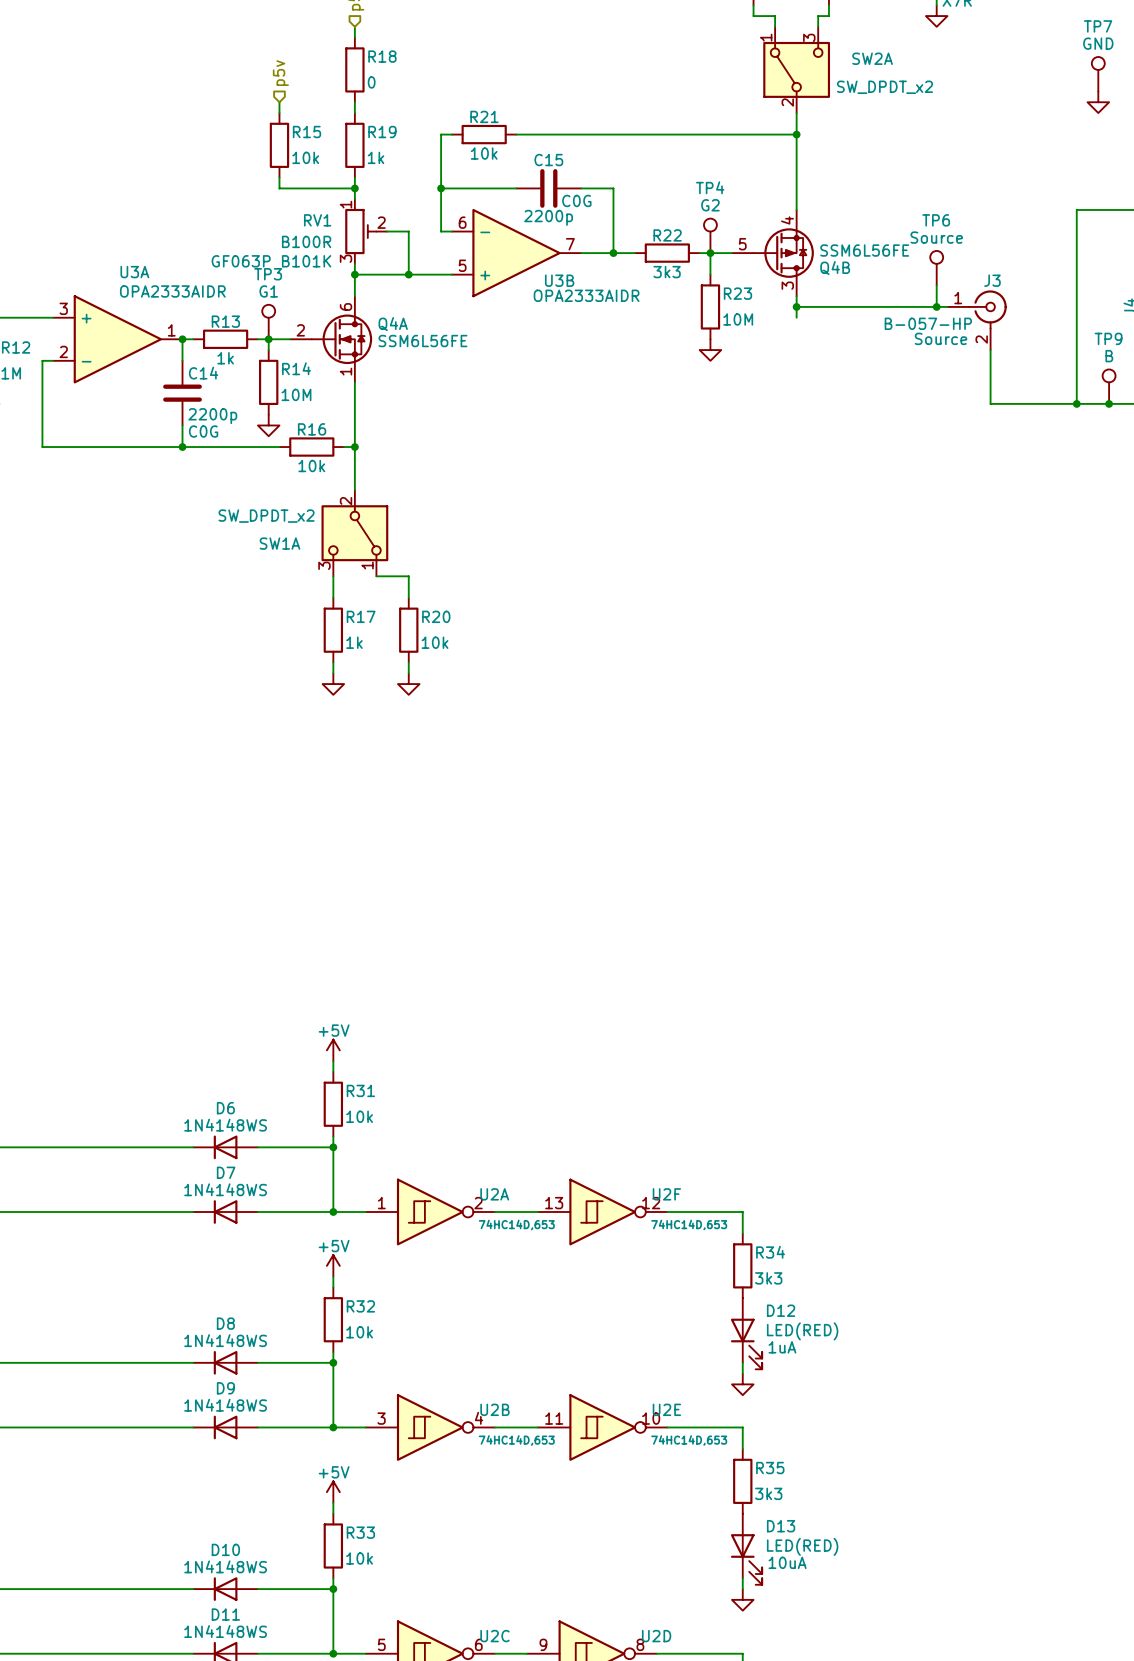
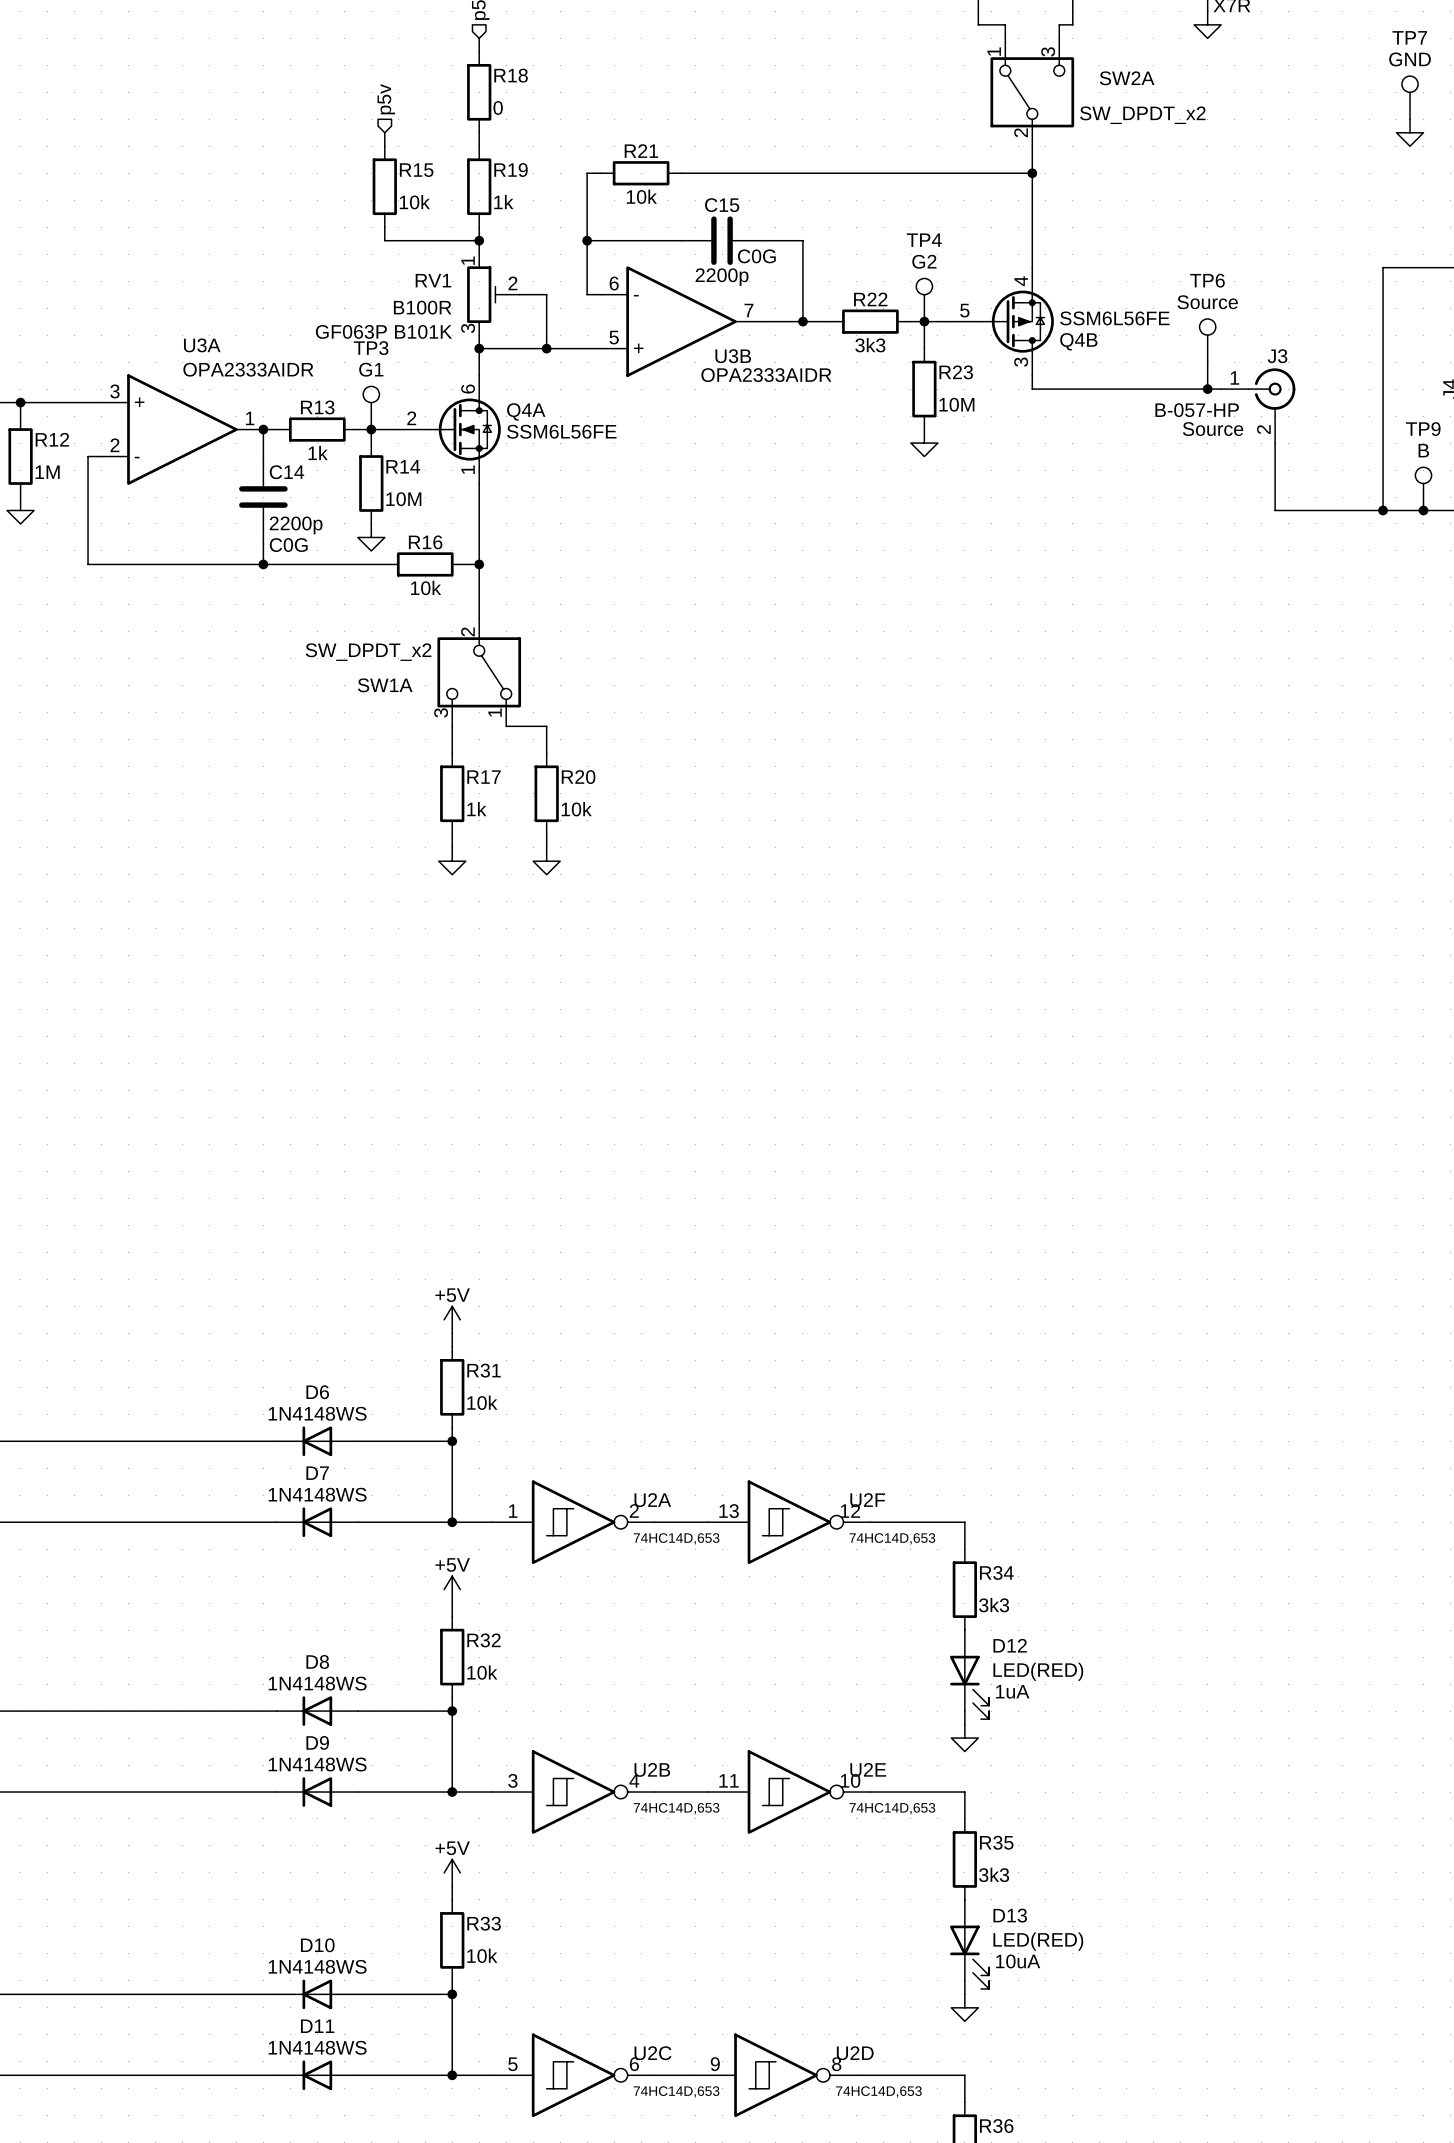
wire: (796, 306) (796, 317) -> none
junction: (796, 306) -> none

